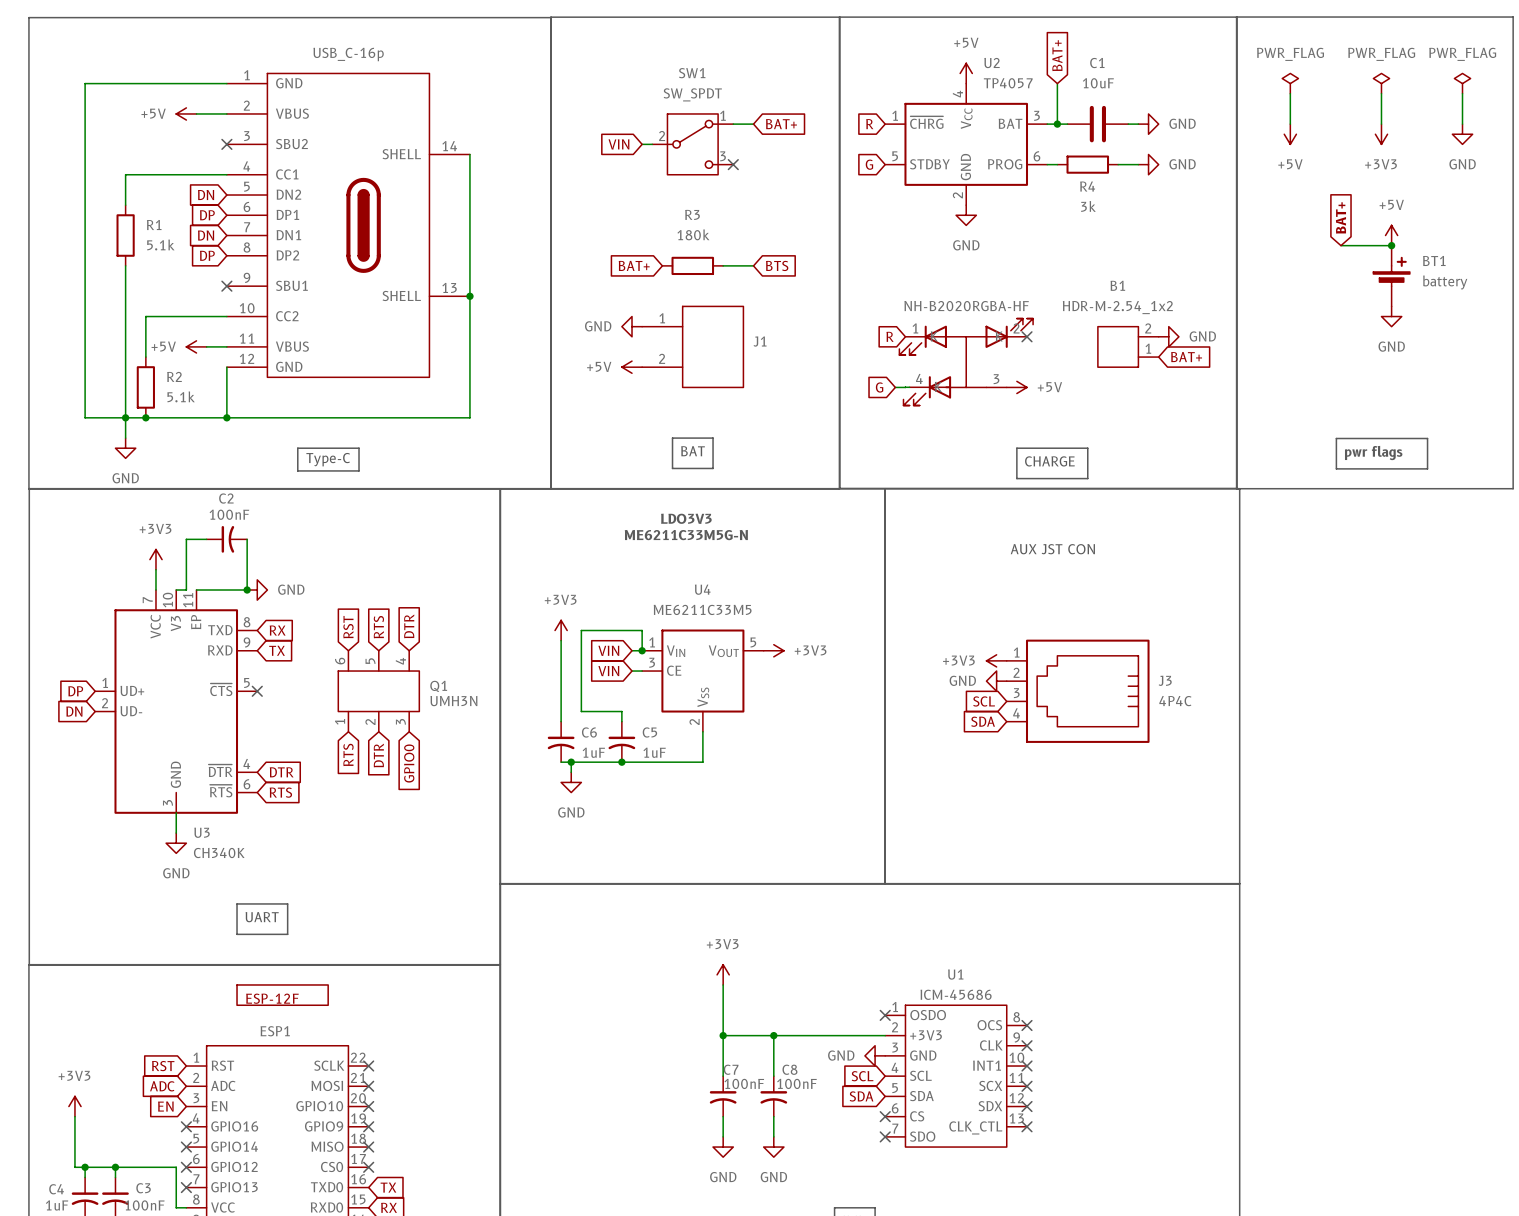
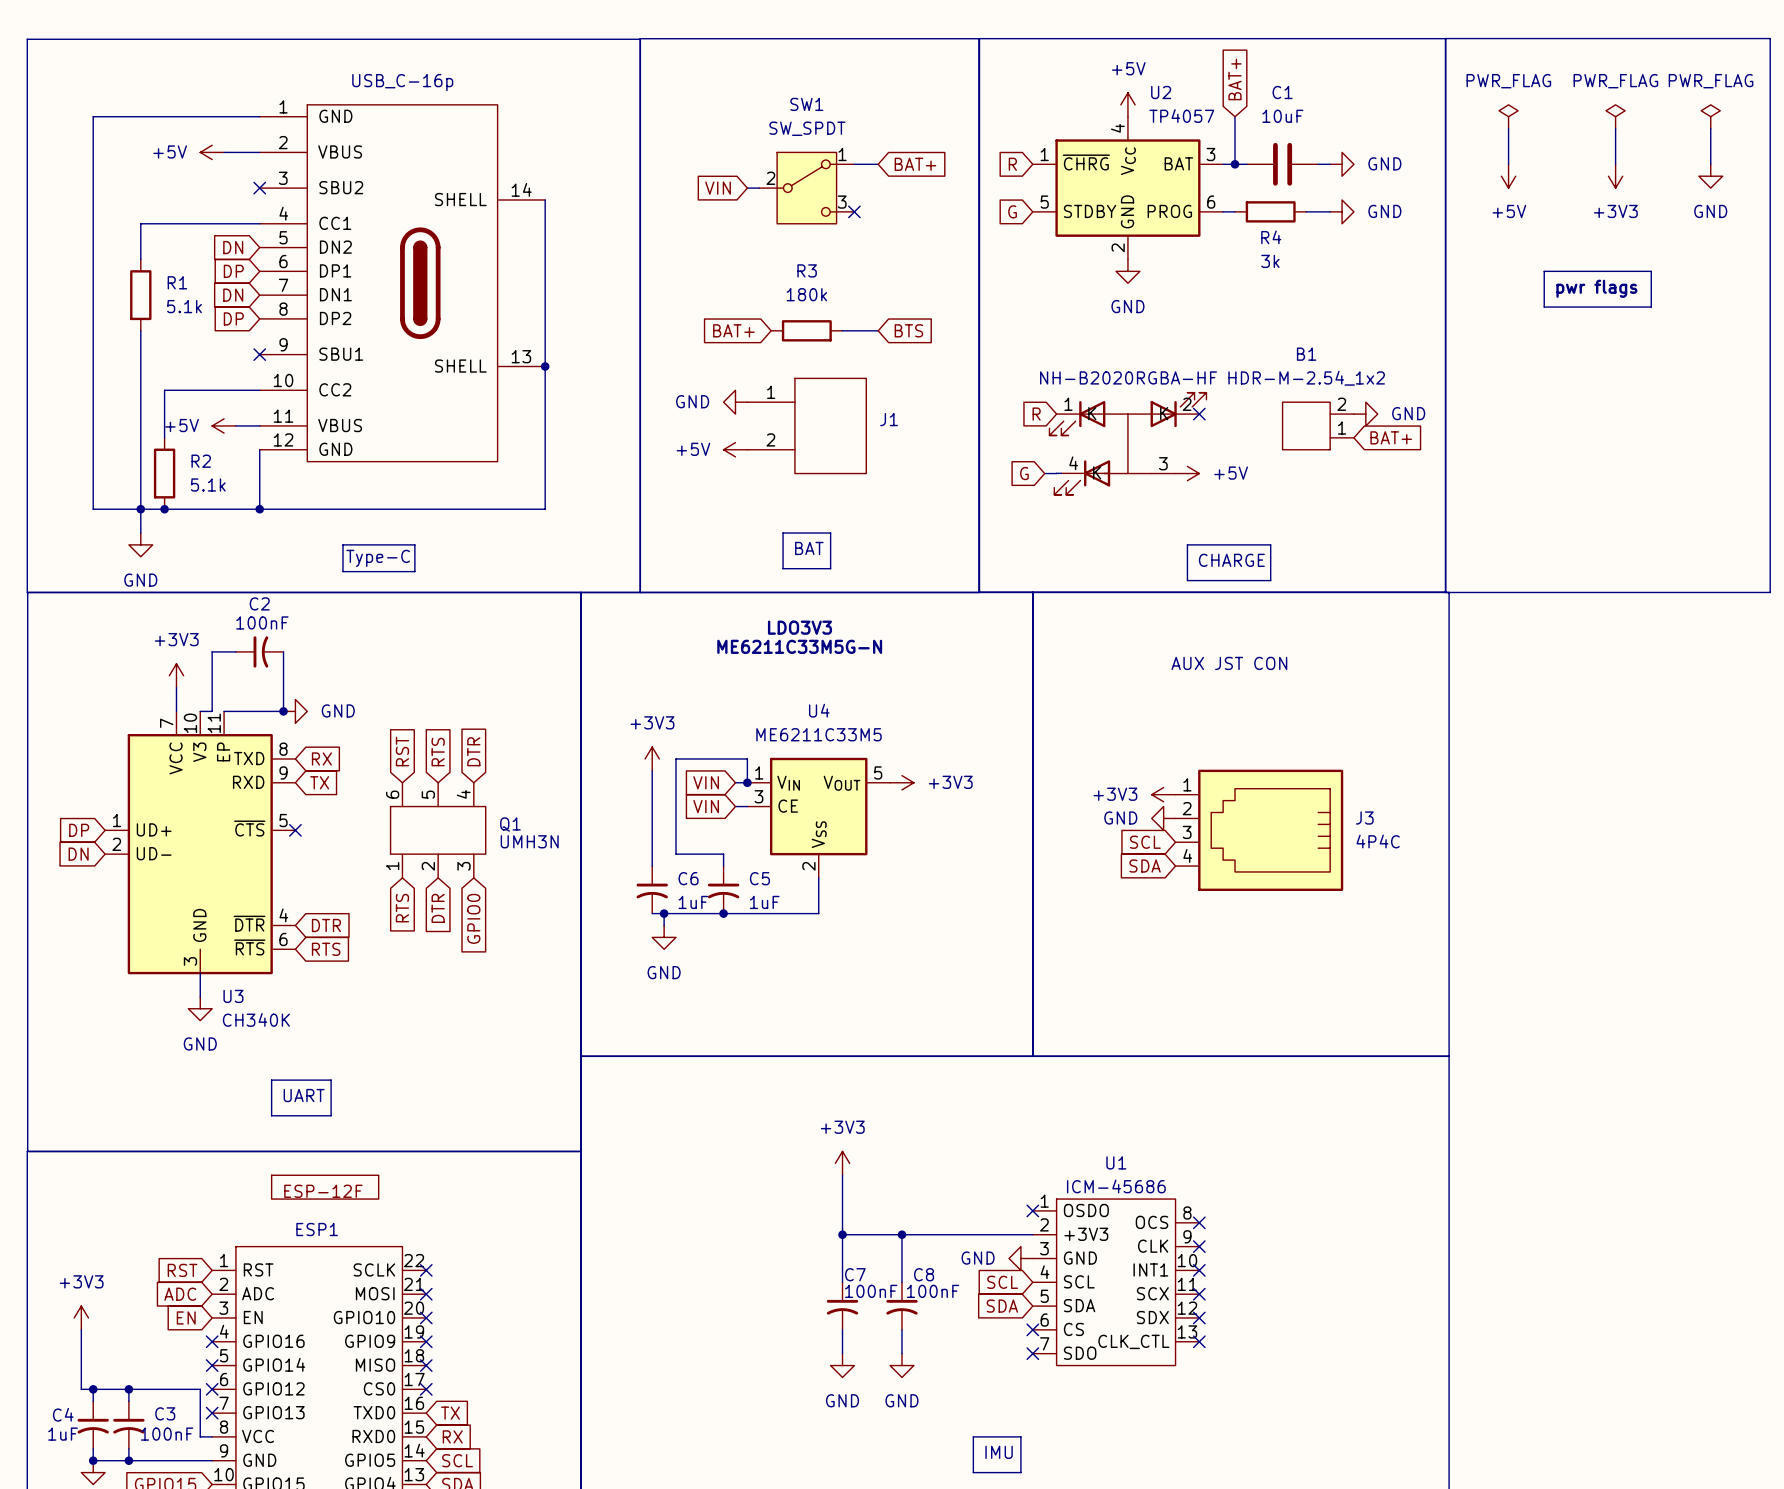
line: none -> (1544, 271) (1651, 271) (1651, 307) (1544, 307) (1544, 271)
global label: BAT+ (1340, 217) -> none
text: none -> pwr flags (1596, 288)
power symbol: +5V (1391, 235) -> none
junction: (1391, 245) -> none
BT1: battery (1391, 276) -> none
power symbol: GND (1391, 316) -> none
line: (1336, 438) (1427, 438) (1427, 468) (1336, 468) (1336, 438) -> none
text: pwr flags (1373, 453) -> none

